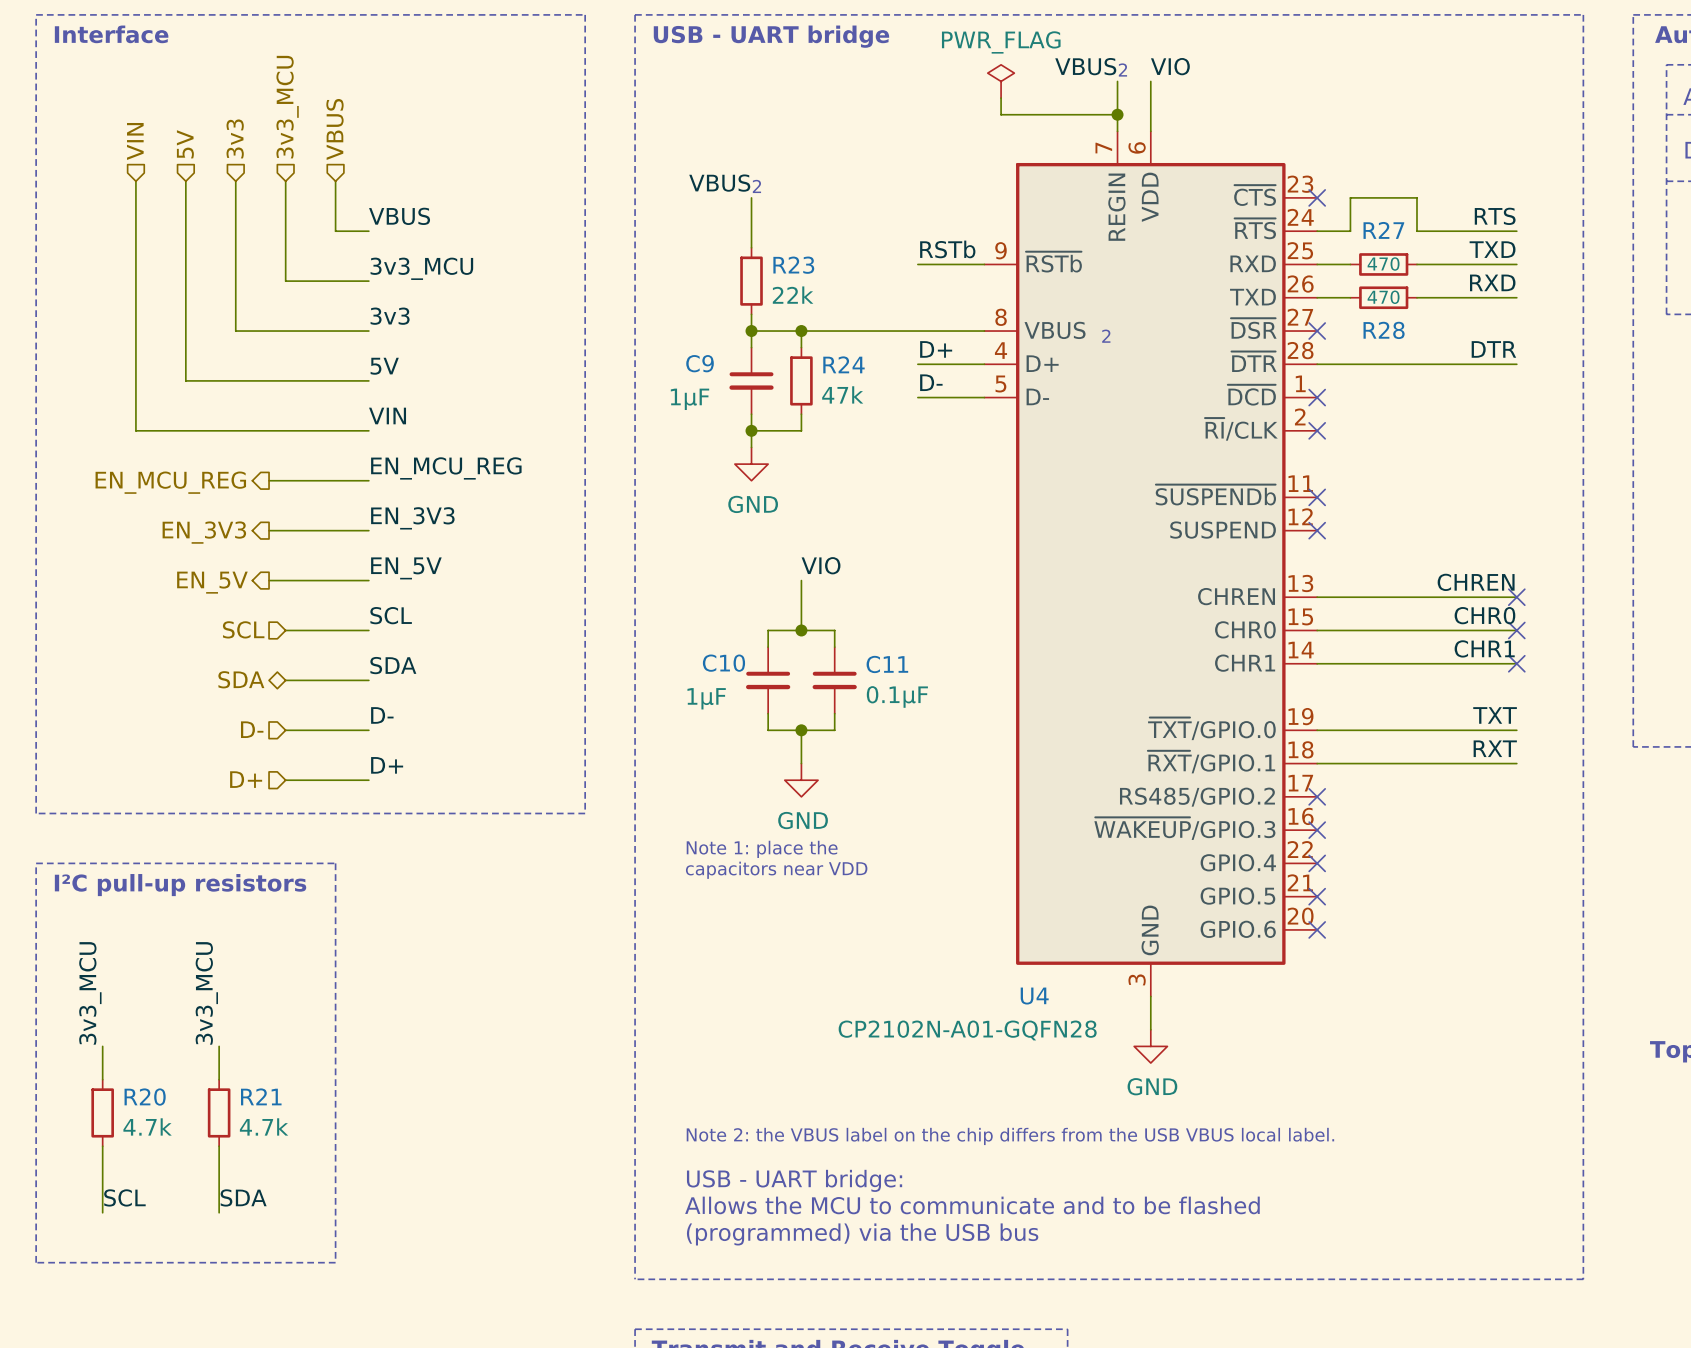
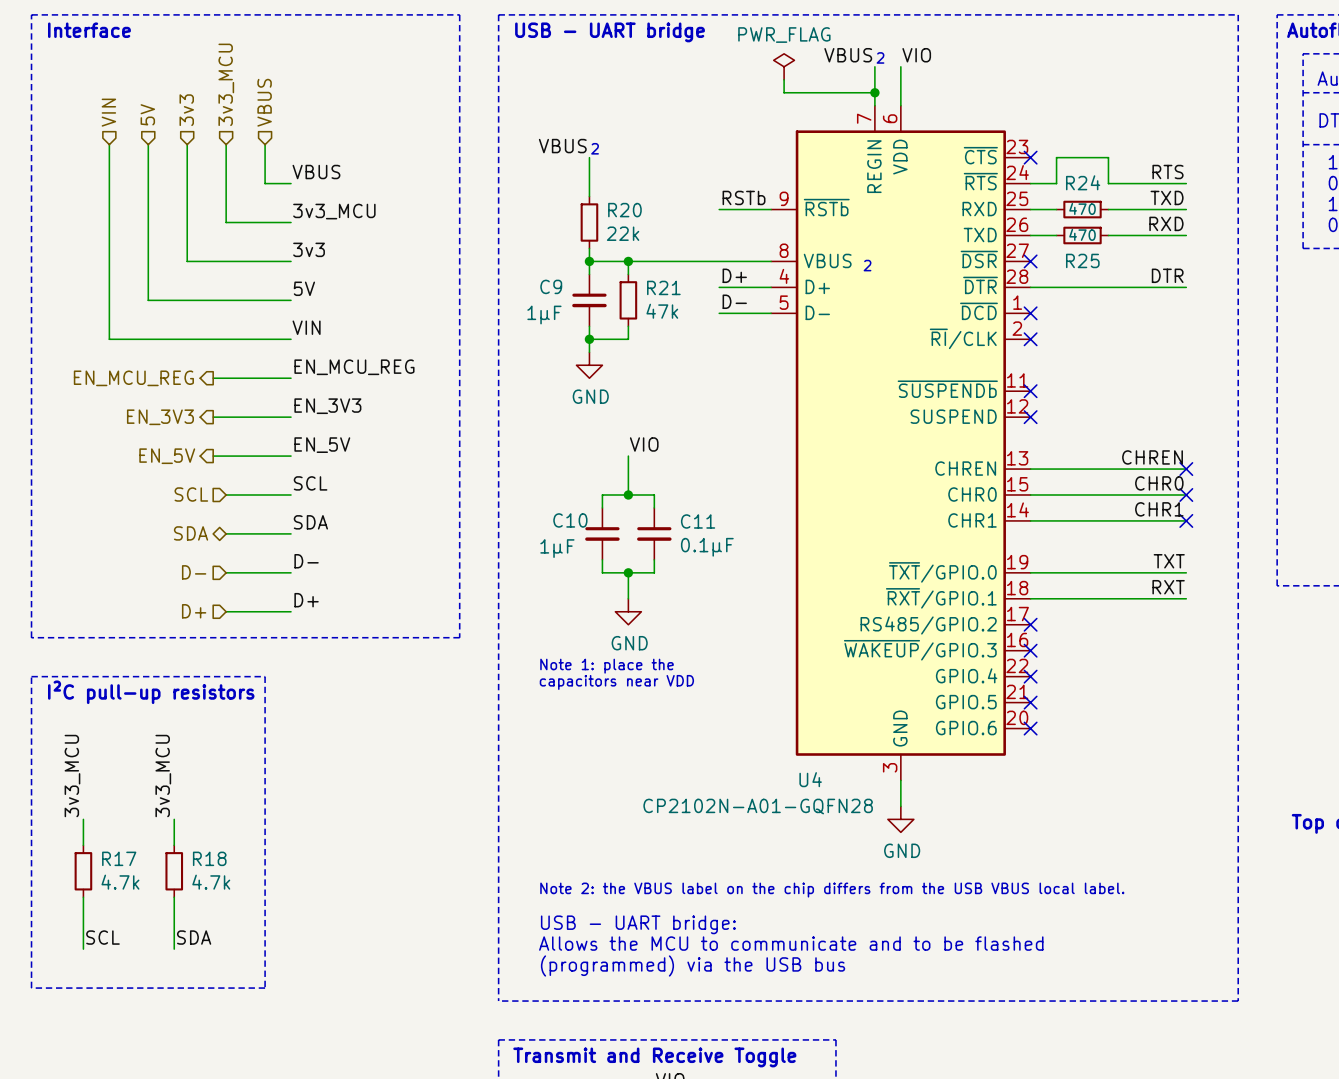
R27 name: R27 (1383, 230) -> R24 (1083, 182)
R23 name: R23 (793, 265) -> R20 (624, 210)
R28 name: R28 (1384, 330) -> R25 (1082, 260)
R24 name: R24 (843, 364) -> R21 (663, 287)
R21 name: R21 (261, 1096) -> R18 (209, 858)
R20 name: R20 (145, 1097) -> R17 (119, 858)

